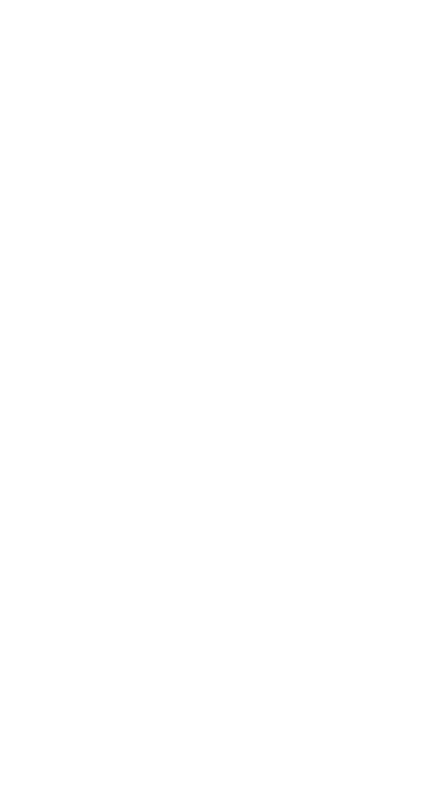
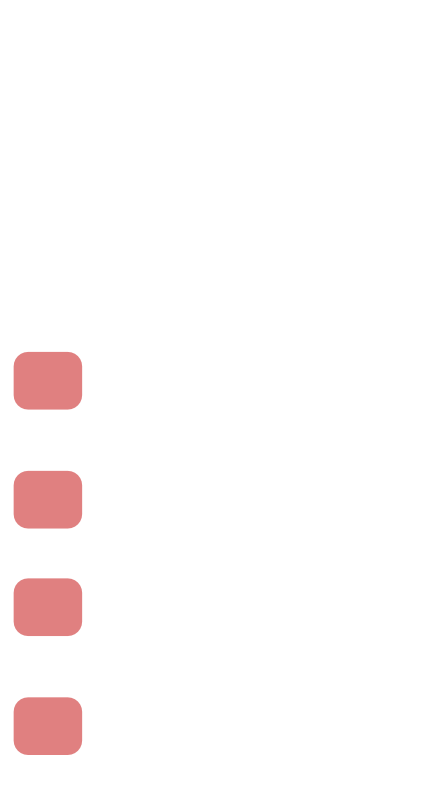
part: none -> (47, 440)
part: none -> (47, 666)

